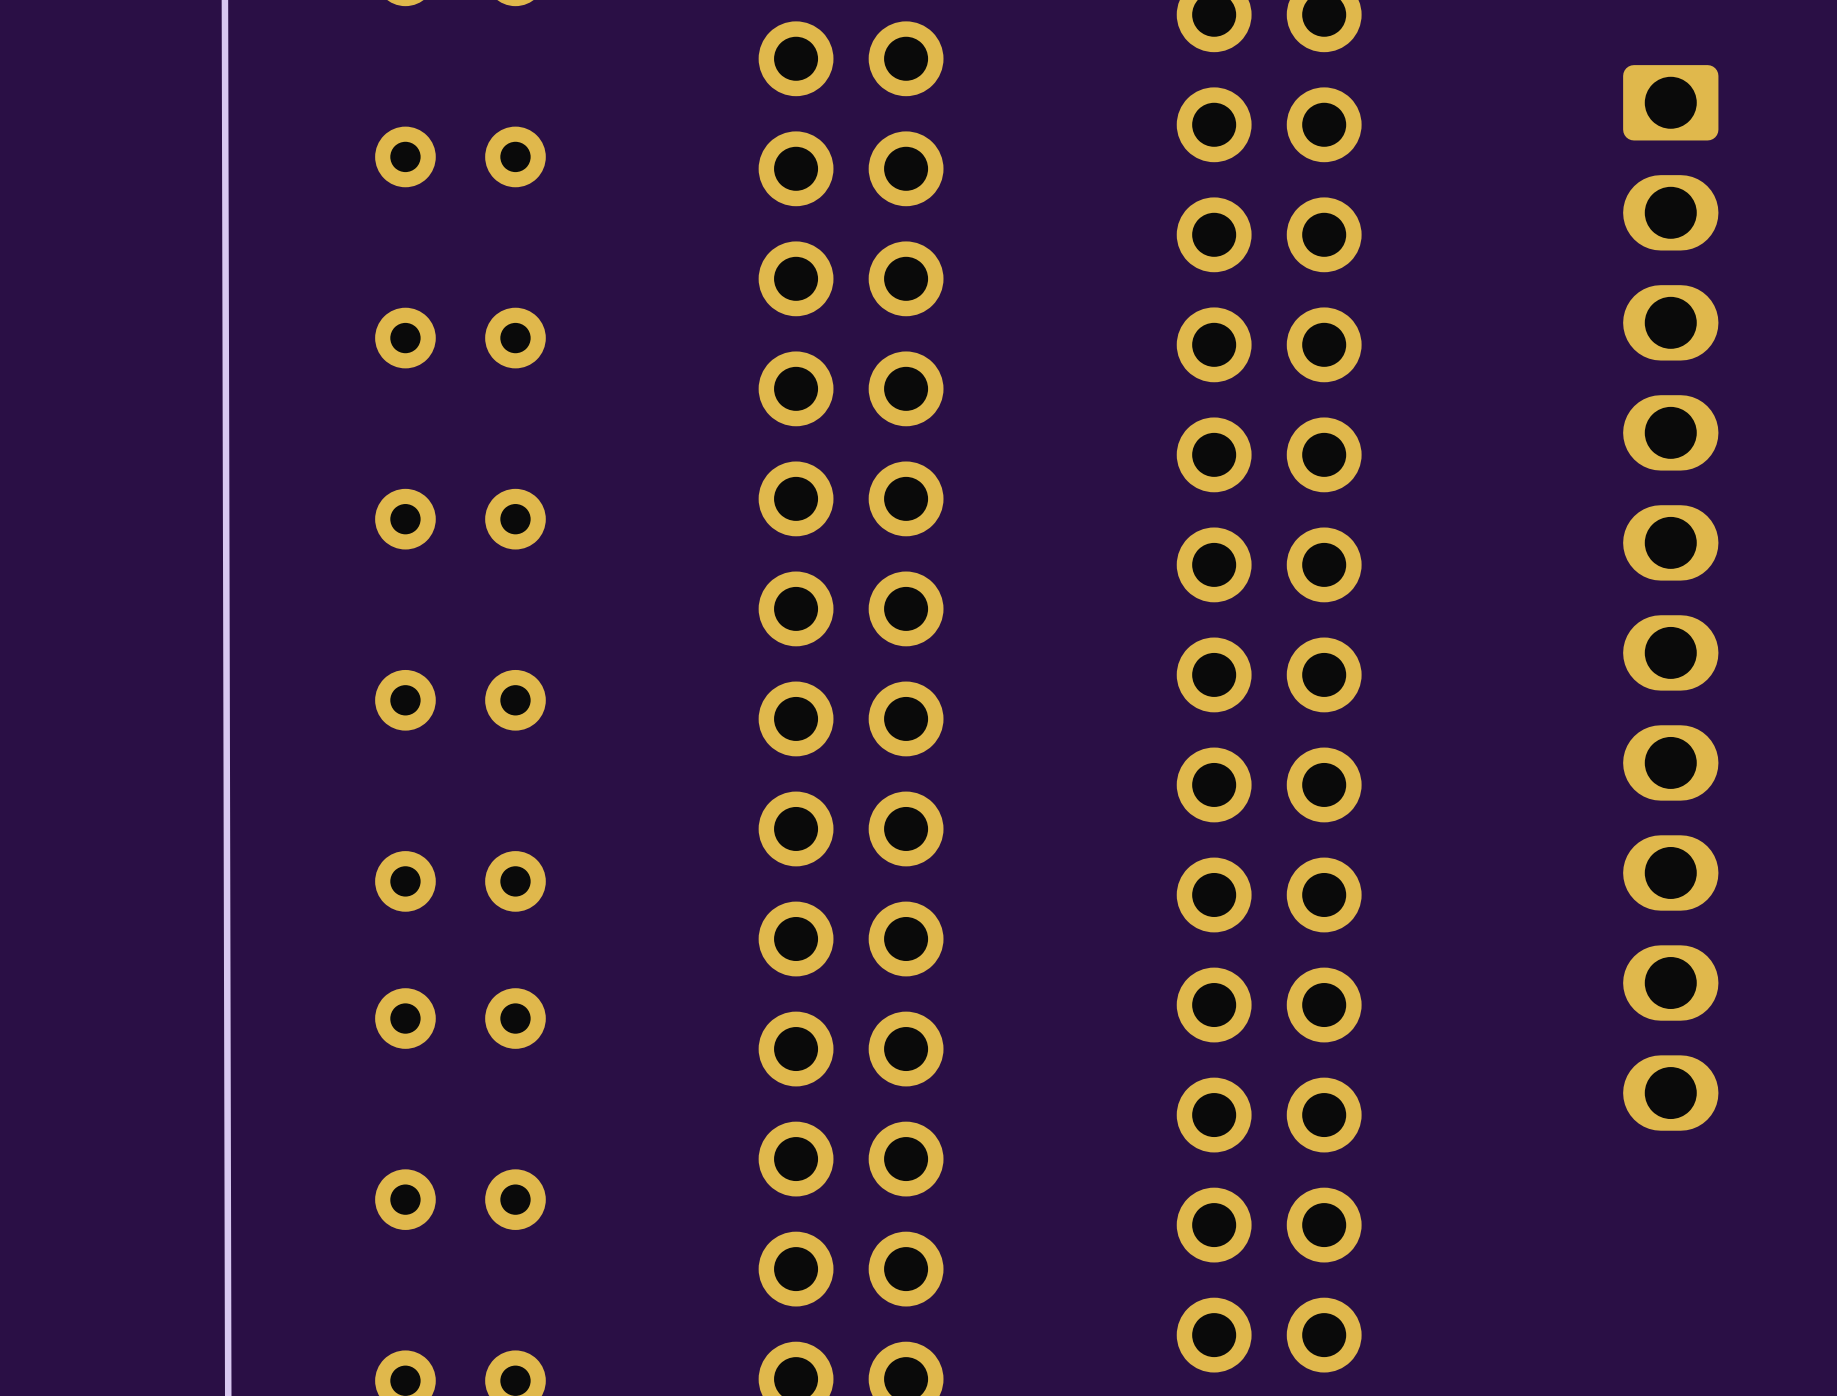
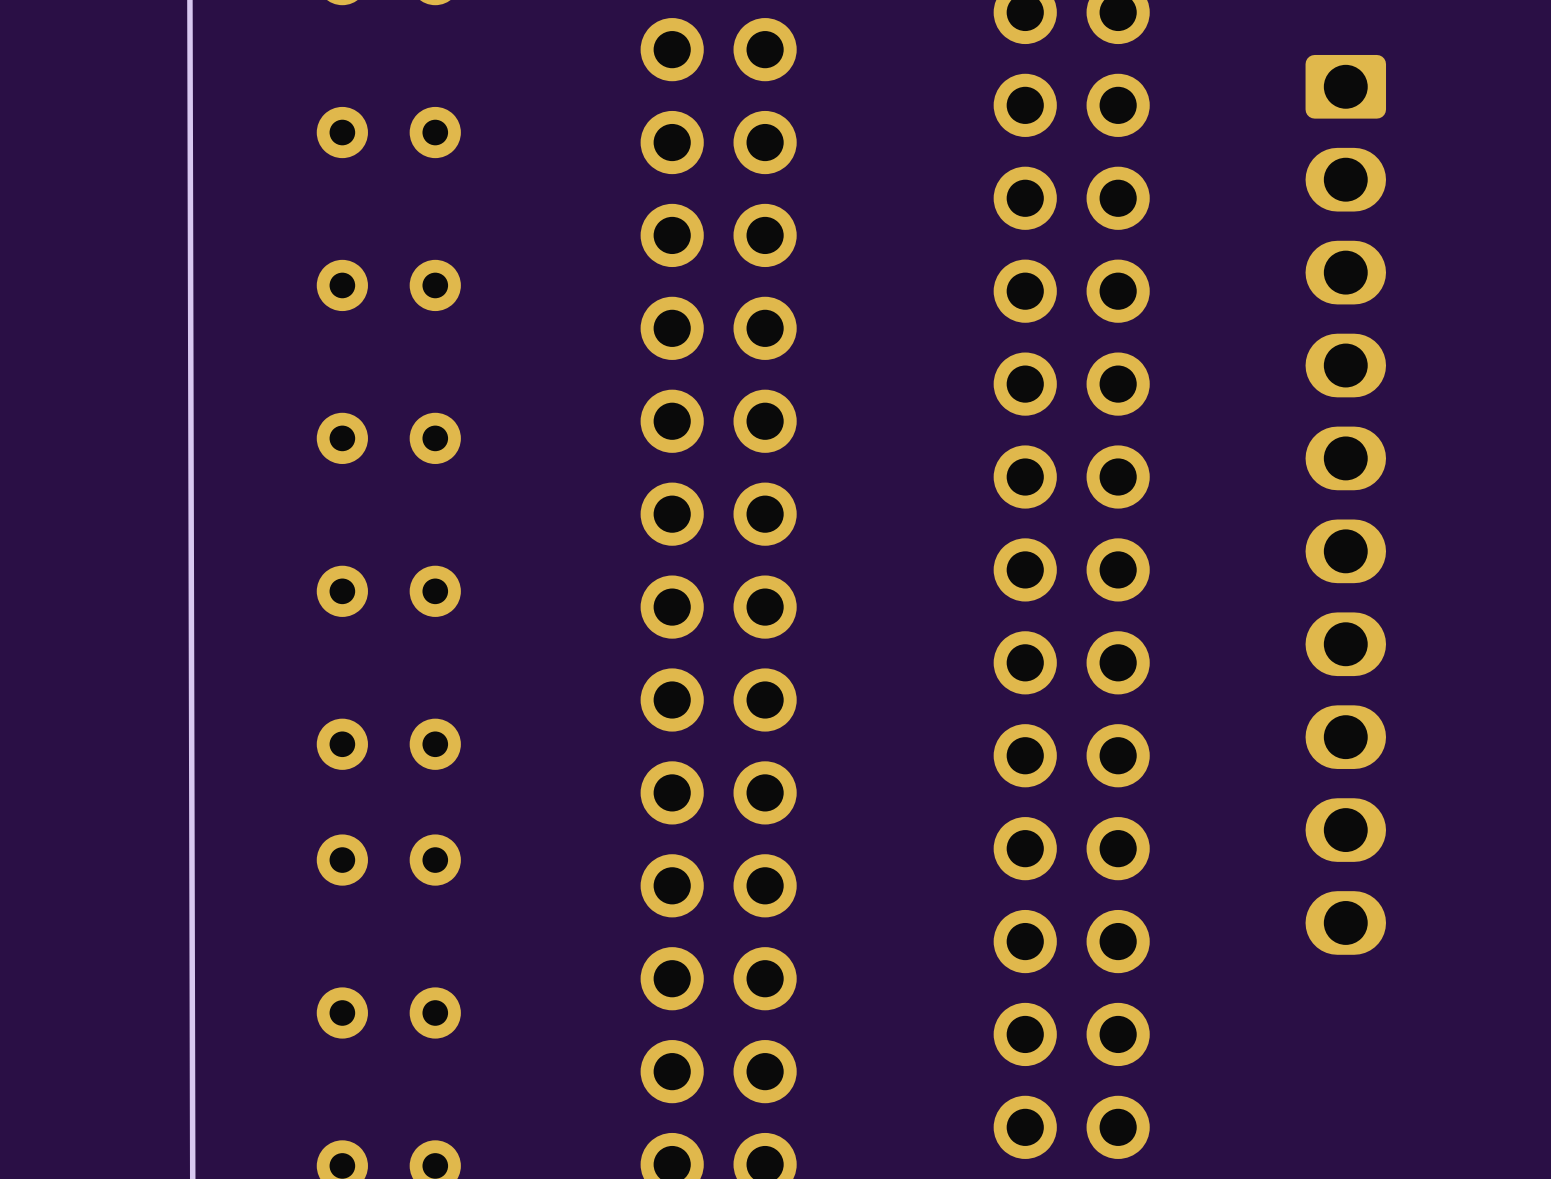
part position: (1670, 597) -> (1345, 504)

